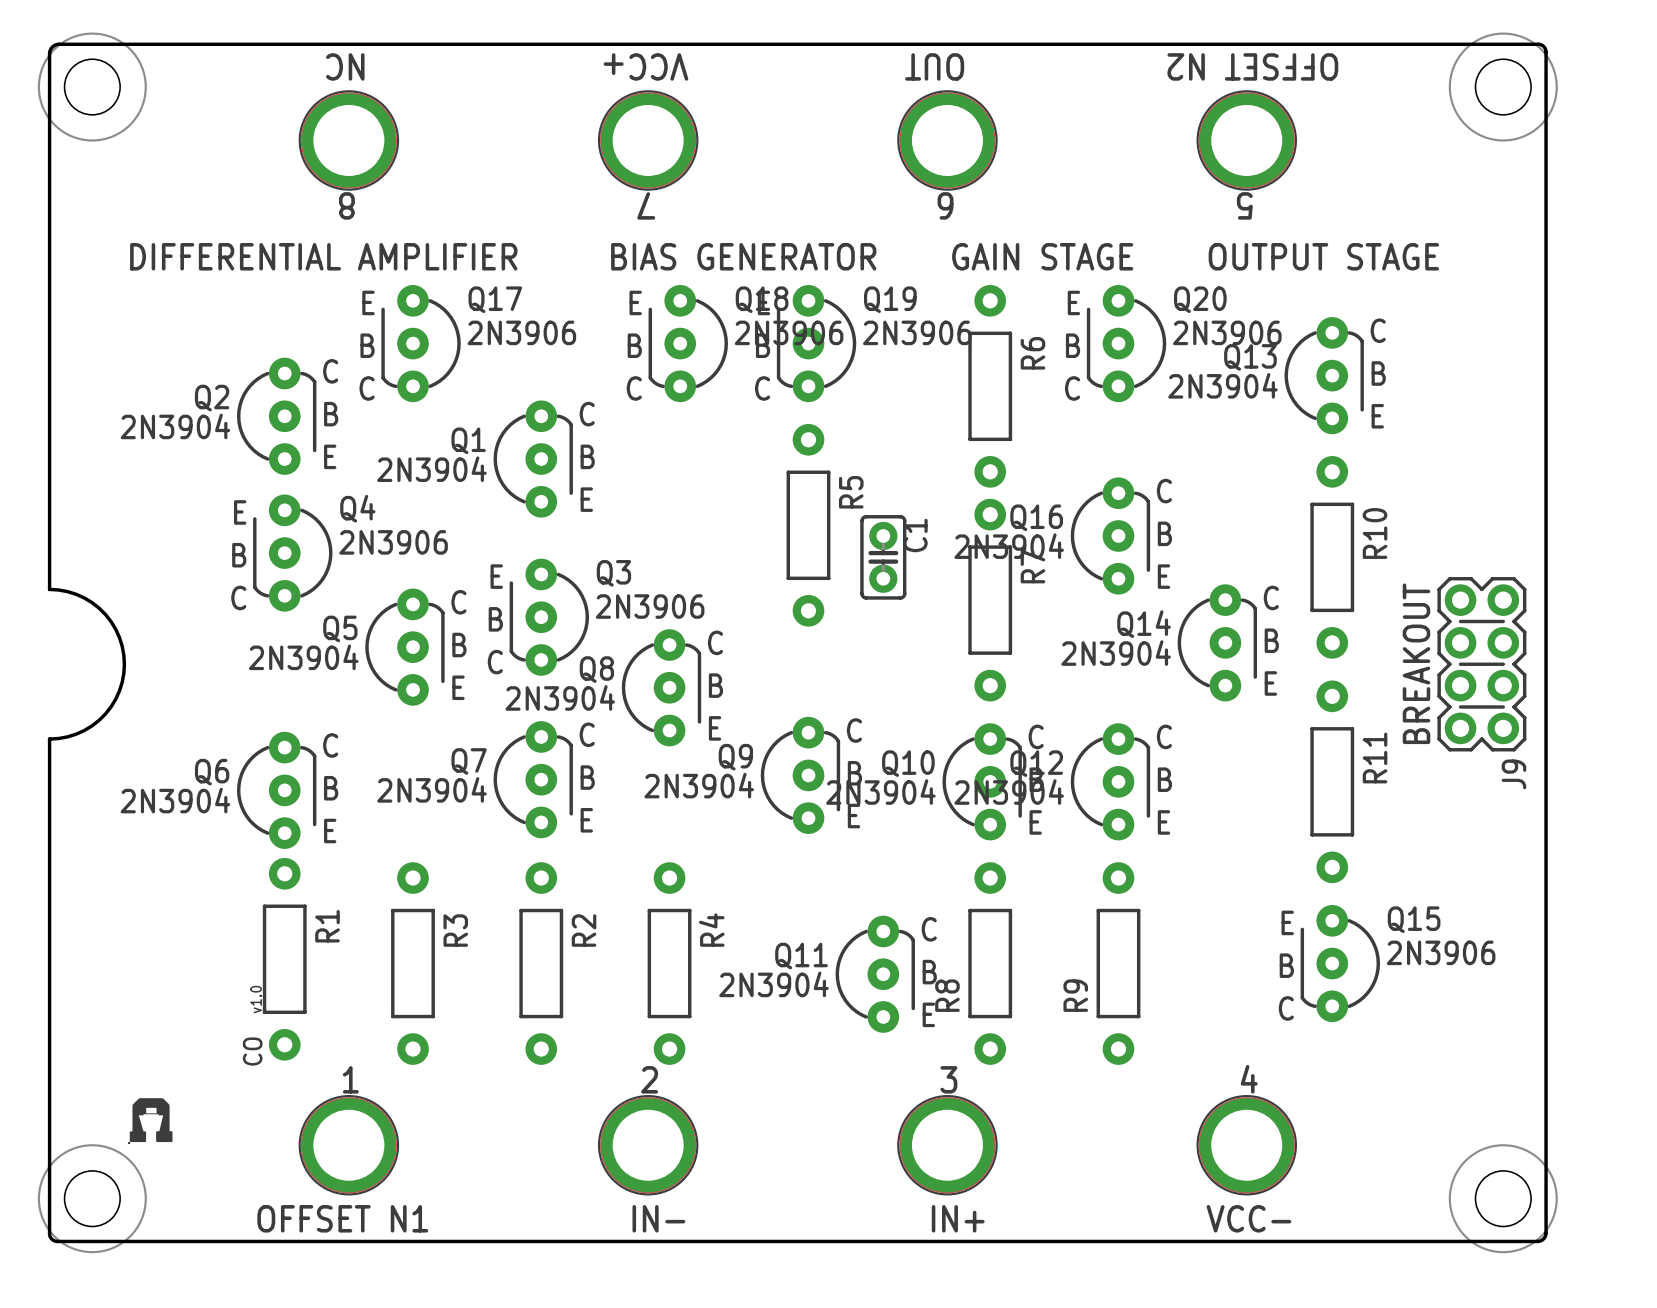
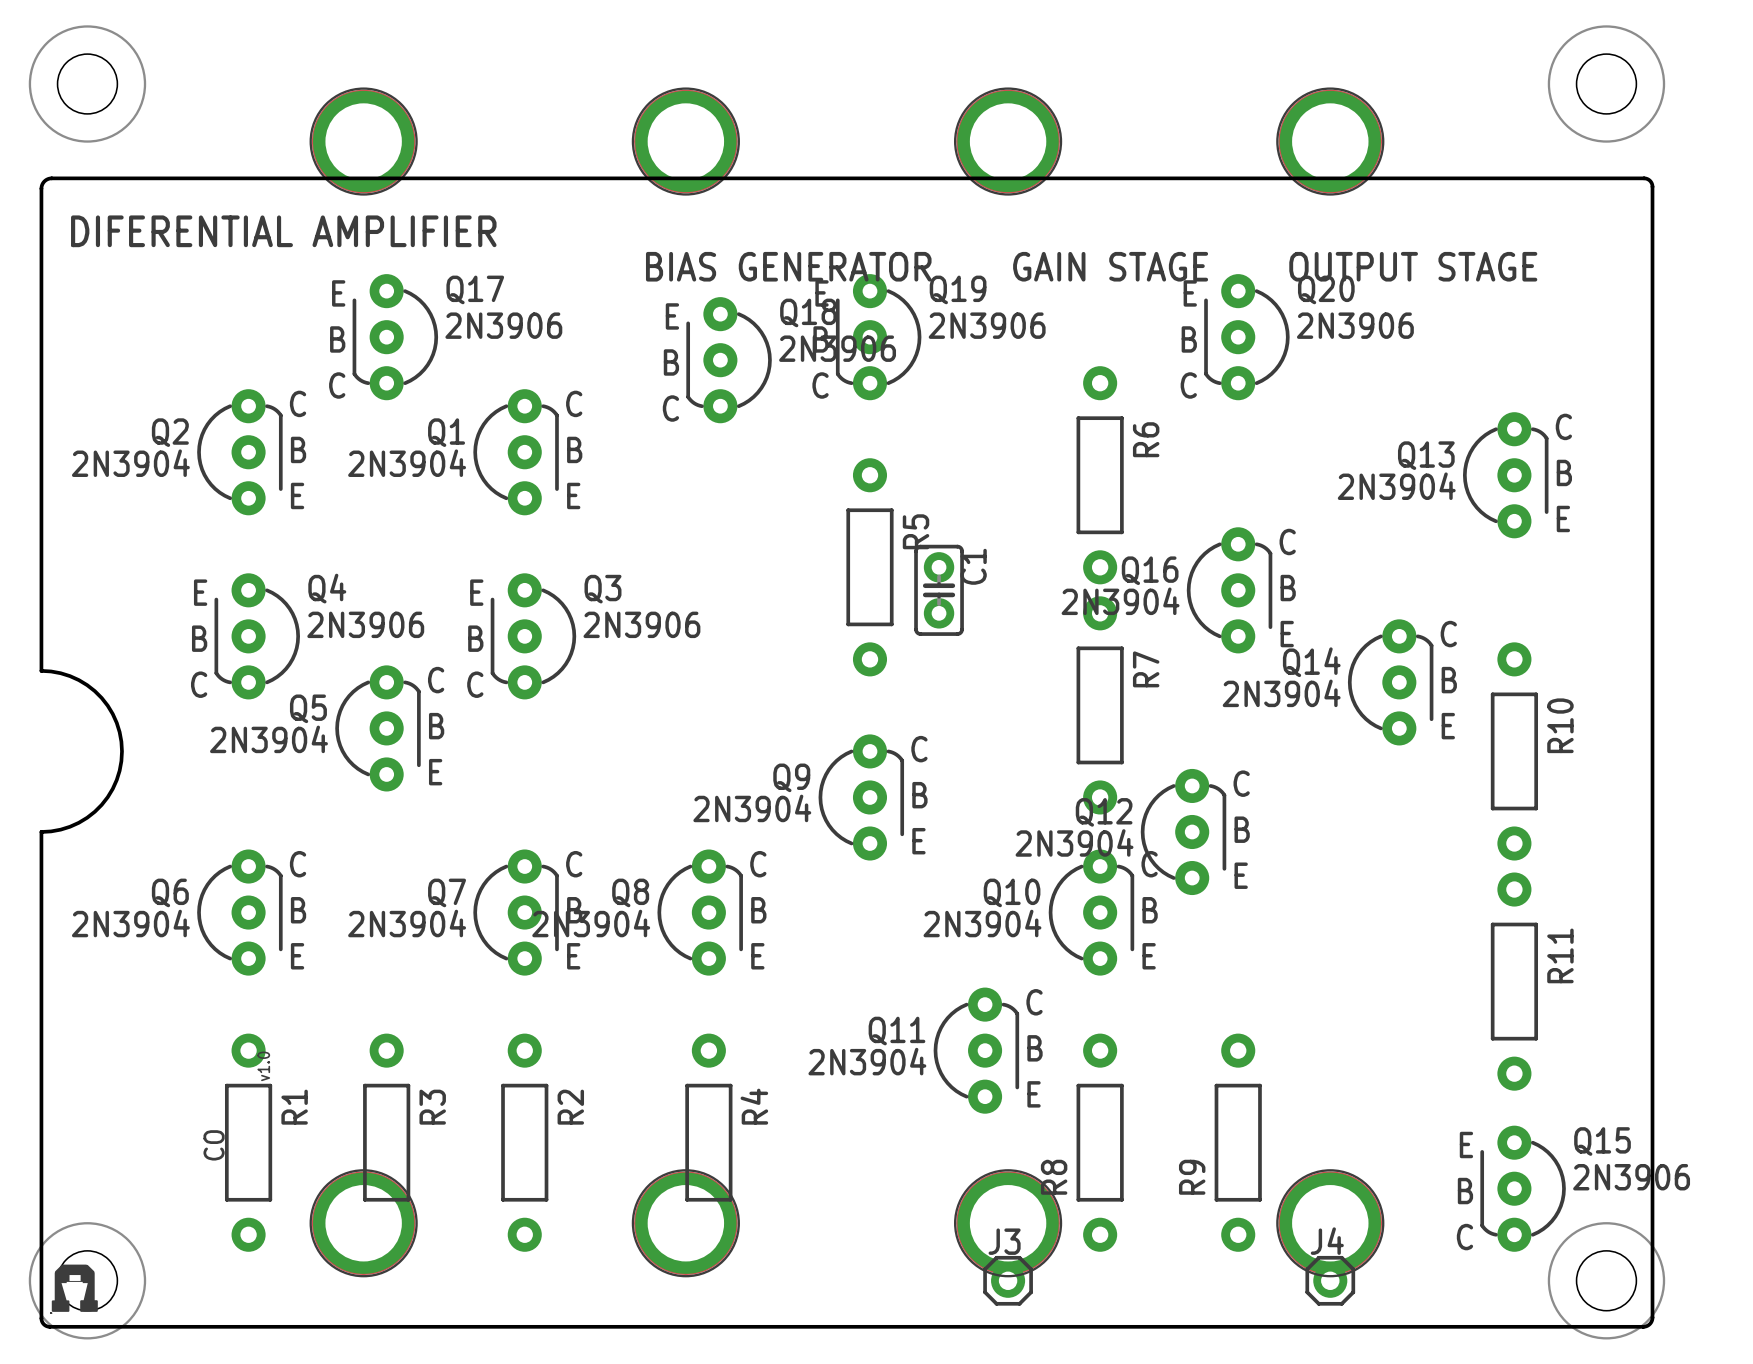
text: NC (345, 66) -> none
text: VCC+ (645, 66) -> none
text: OUT (934, 66) -> none
text: OFFSET N2 (1252, 66) -> none
board edge: (1546, 182) (1546, 52) (1543, 46) (1539, 44) (59, 44) (53, 46) (49, 52) (49, 184) -> (1652, 186) (1650, 180) (1644, 178) (51, 178) (44, 181) (41, 188)
text: 8 (346, 205) -> none
text: 7 (646, 205) -> none
text: 6 (945, 205) -> none
text: 5 (1244, 205) -> none
text: DIFFERENTIAL AMPLIFIER (323, 256) -> DIFERENTIAL AMPLIFIER (283, 231)
Q17 position: (421, 343) -> (395, 337)
Q19 position: (816, 343) -> (878, 337)
Q20 position: (1126, 343) -> (1246, 337)
Q13 position: (1324, 375) -> (1505, 475)
R6 position: (990, 386) -> (1100, 475)
Q2 position: (276, 416) -> (239, 452)
Q1 position: (533, 459) -> (516, 452)
R5 position: (808, 525) -> (869, 567)
Q16 position: (1110, 535) -> (1229, 590)
Q4 position: (292, 553) -> (257, 636)
R10 position: (1332, 557) -> (1514, 751)
board edge: (49, 589) (76, 594) (99, 608) (115, 629) (122, 646) (124, 664) (119, 690) (105, 713) (84, 730) (67, 736) (49, 739) (49, 781) -> (41, 624) (41, 670) (70, 676) (94, 691) (112, 714) (119, 732) (121, 751) (119, 770) (112, 788) (94, 811) (70, 826) (41, 831)
R7 position: (990, 600) -> (1100, 705)
Q3 position: (549, 617) -> (533, 636)
Q14 position: (1217, 642) -> (1390, 682)
Q5 position: (404, 647) -> (377, 728)
text: BREAKOUT (1416, 663) -> none
J9: (1481, 664) -> none
Q8 position: (661, 687) -> (700, 912)
Q9 position: (800, 775) -> (861, 797)
Q7 position: (533, 779) -> (516, 912)
Q10 position: (982, 781) -> (1091, 912)
R11 position: (1332, 781) -> (1514, 981)
Q6 position: (276, 790) -> (239, 912)
R1 position: (284, 959) -> (248, 1142)
R3 position: (413, 963) -> (386, 1142)
R2 position: (541, 963) -> (524, 1142)
R4 position: (669, 963) -> (708, 1142)
R8 position: (990, 963) -> (1100, 1142)
R9 position: (1118, 963) -> (1238, 1142)
Q15 position: (1340, 963) -> (1523, 1188)
Q11 position: (875, 974) -> (976, 1050)
text position: CO (252, 1051) -> CO (214, 1145)
text: 1 (350, 1079) -> none
text: 2 (649, 1079) -> none
text: 3 (948, 1079) -> none
text: 4 (1249, 1079) -> none
drawing position: (151, 1120) -> (74, 1288)
J3: none -> (1008, 1280)
J4: none -> (1330, 1280)
text: OFFSET N1 (342, 1218) -> none
text: IN- (658, 1218) -> none
text: IN+ (958, 1218) -> none
text: VCC- (1248, 1218) -> none

